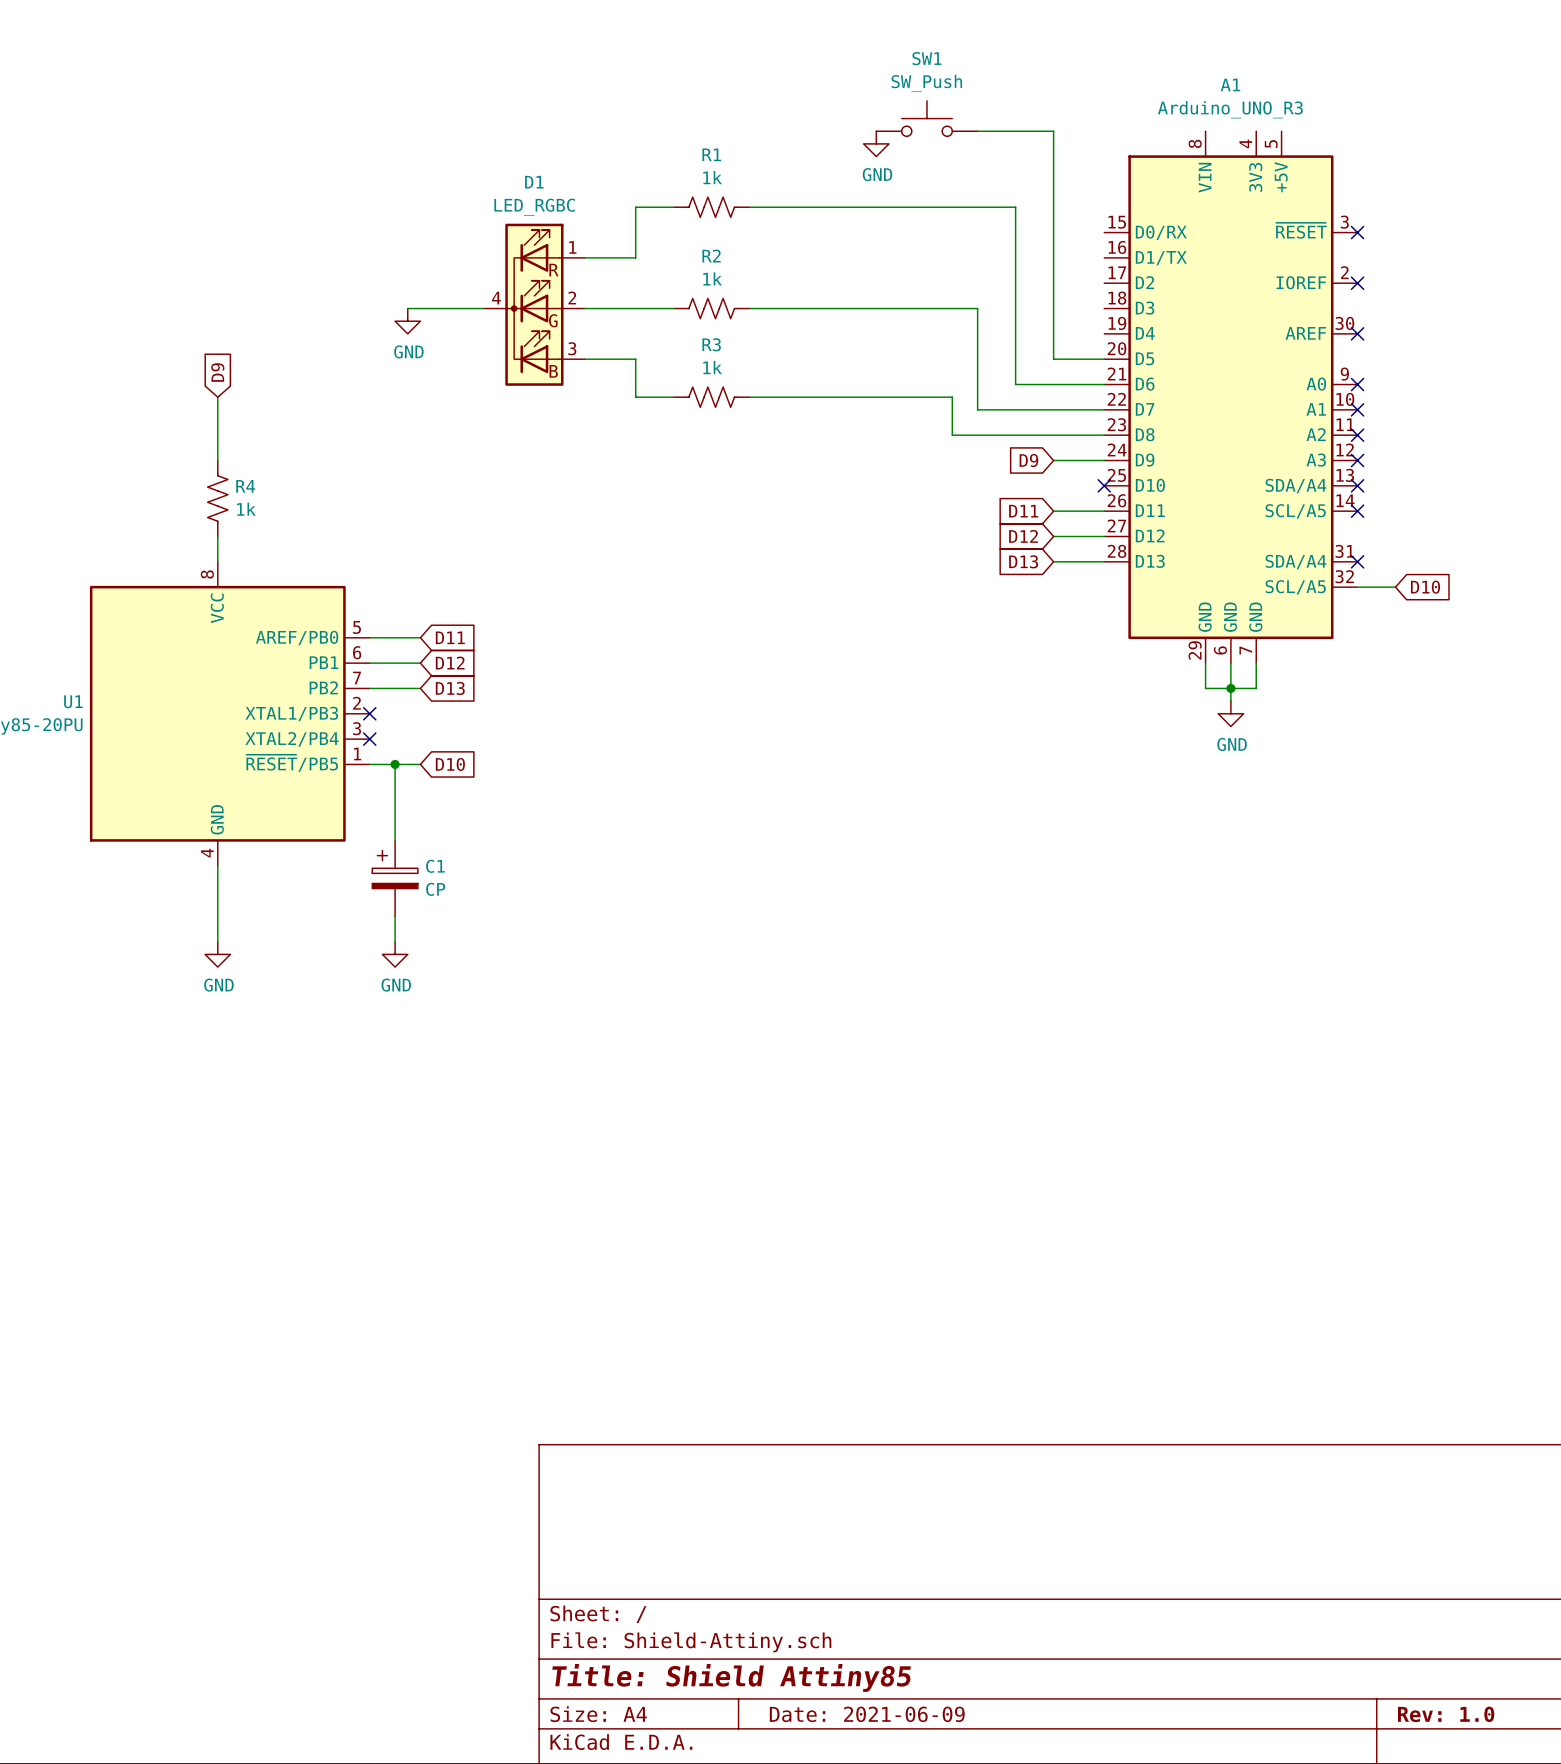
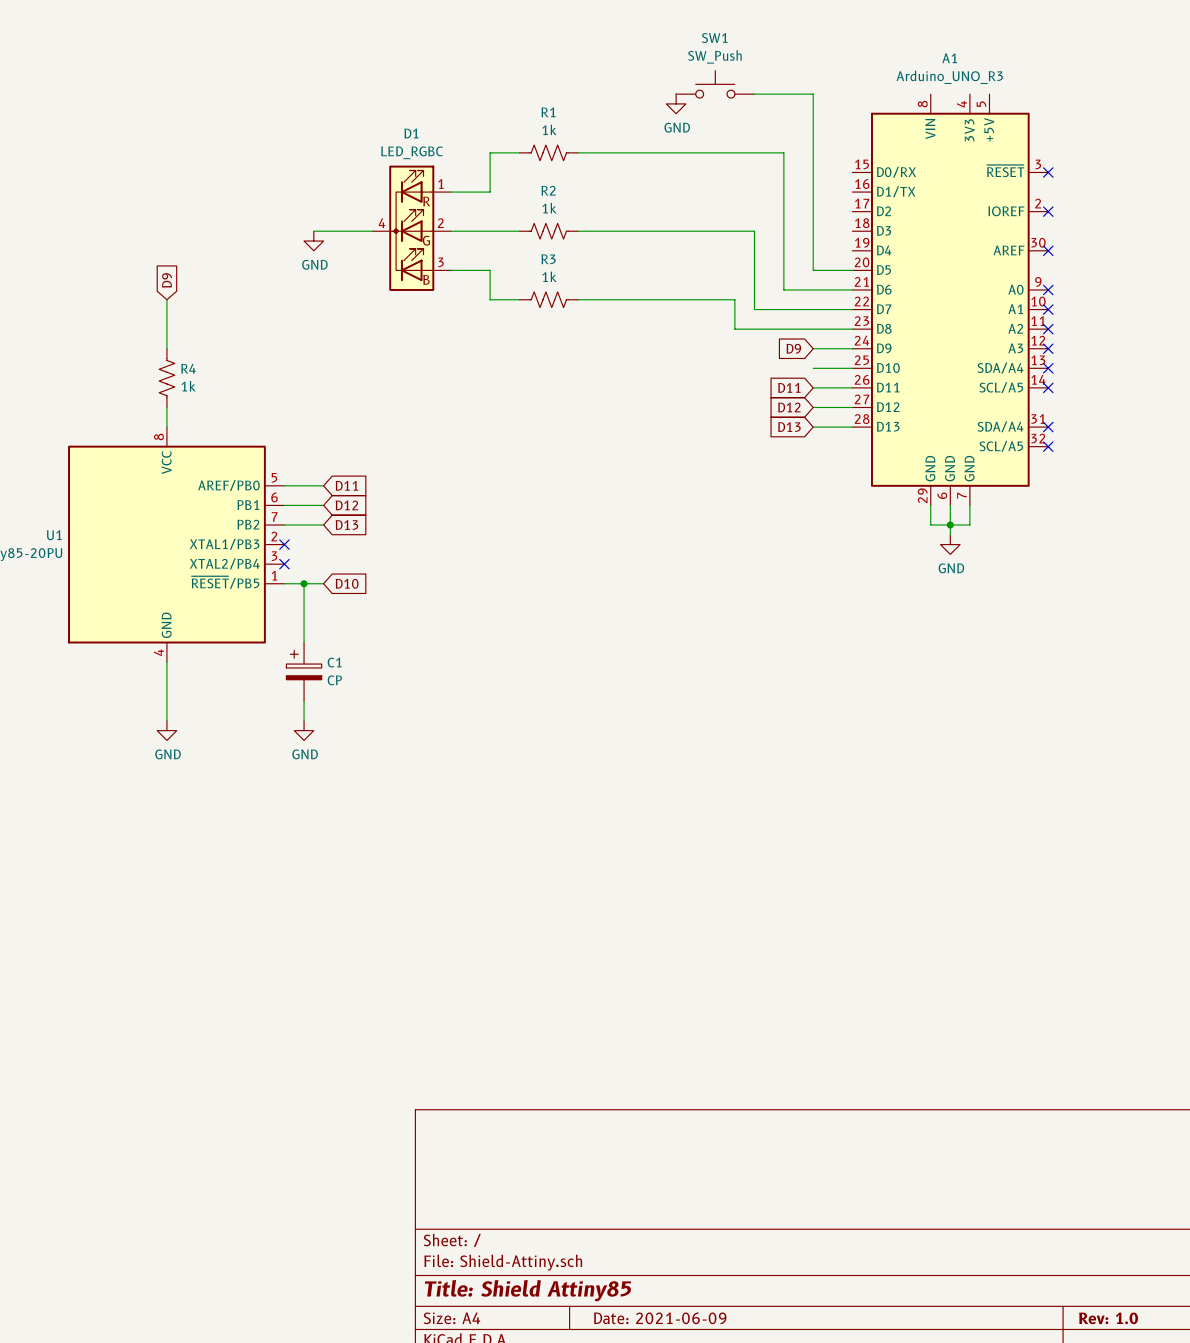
wire: none -> (813, 368) (852, 368)
no-connect mark: (1104, 485) -> none
wire: (1357, 587) (1395, 587) -> none
no-connect mark: none -> (1048, 446)
global label: D10 (1425, 587) -> none

